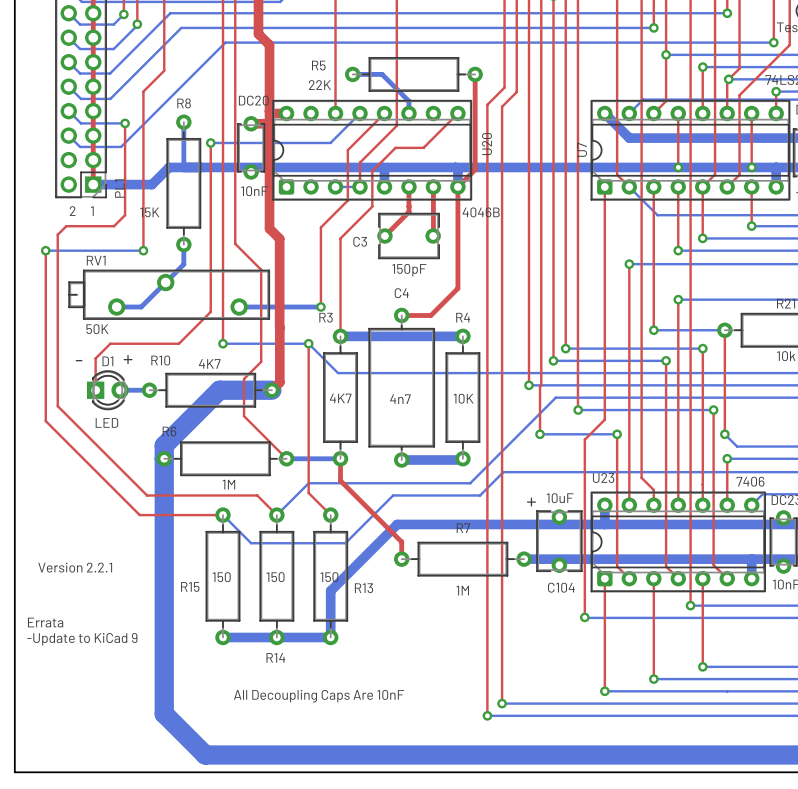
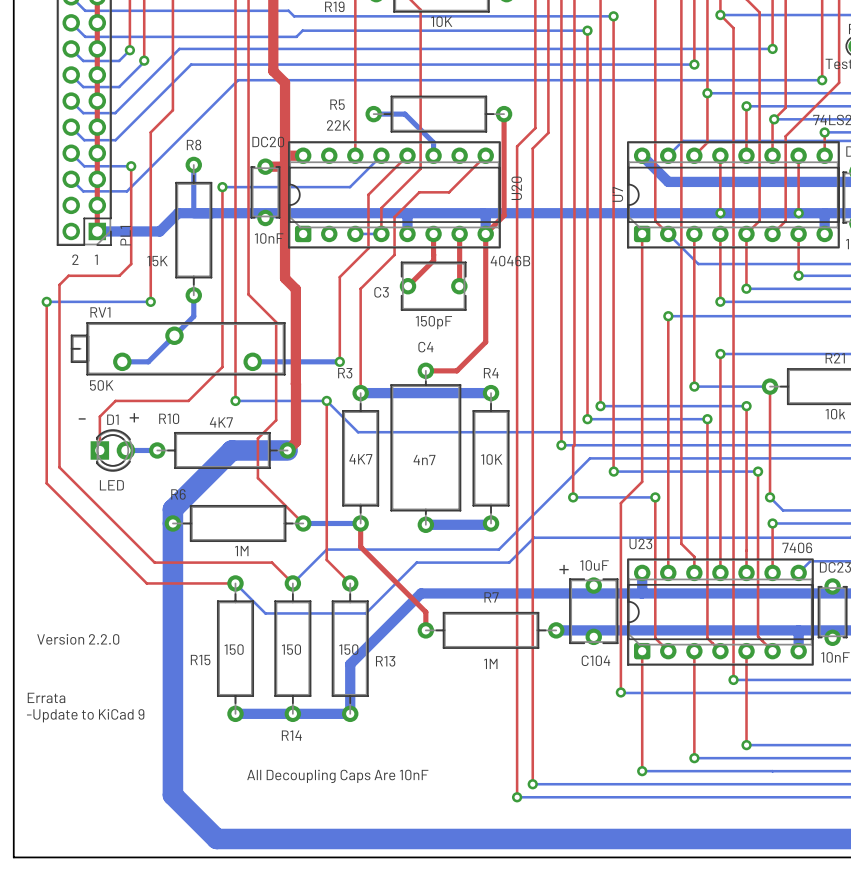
text: Version 2.2.1 (75, 567) -> Version 2.2.0 (78, 639)

